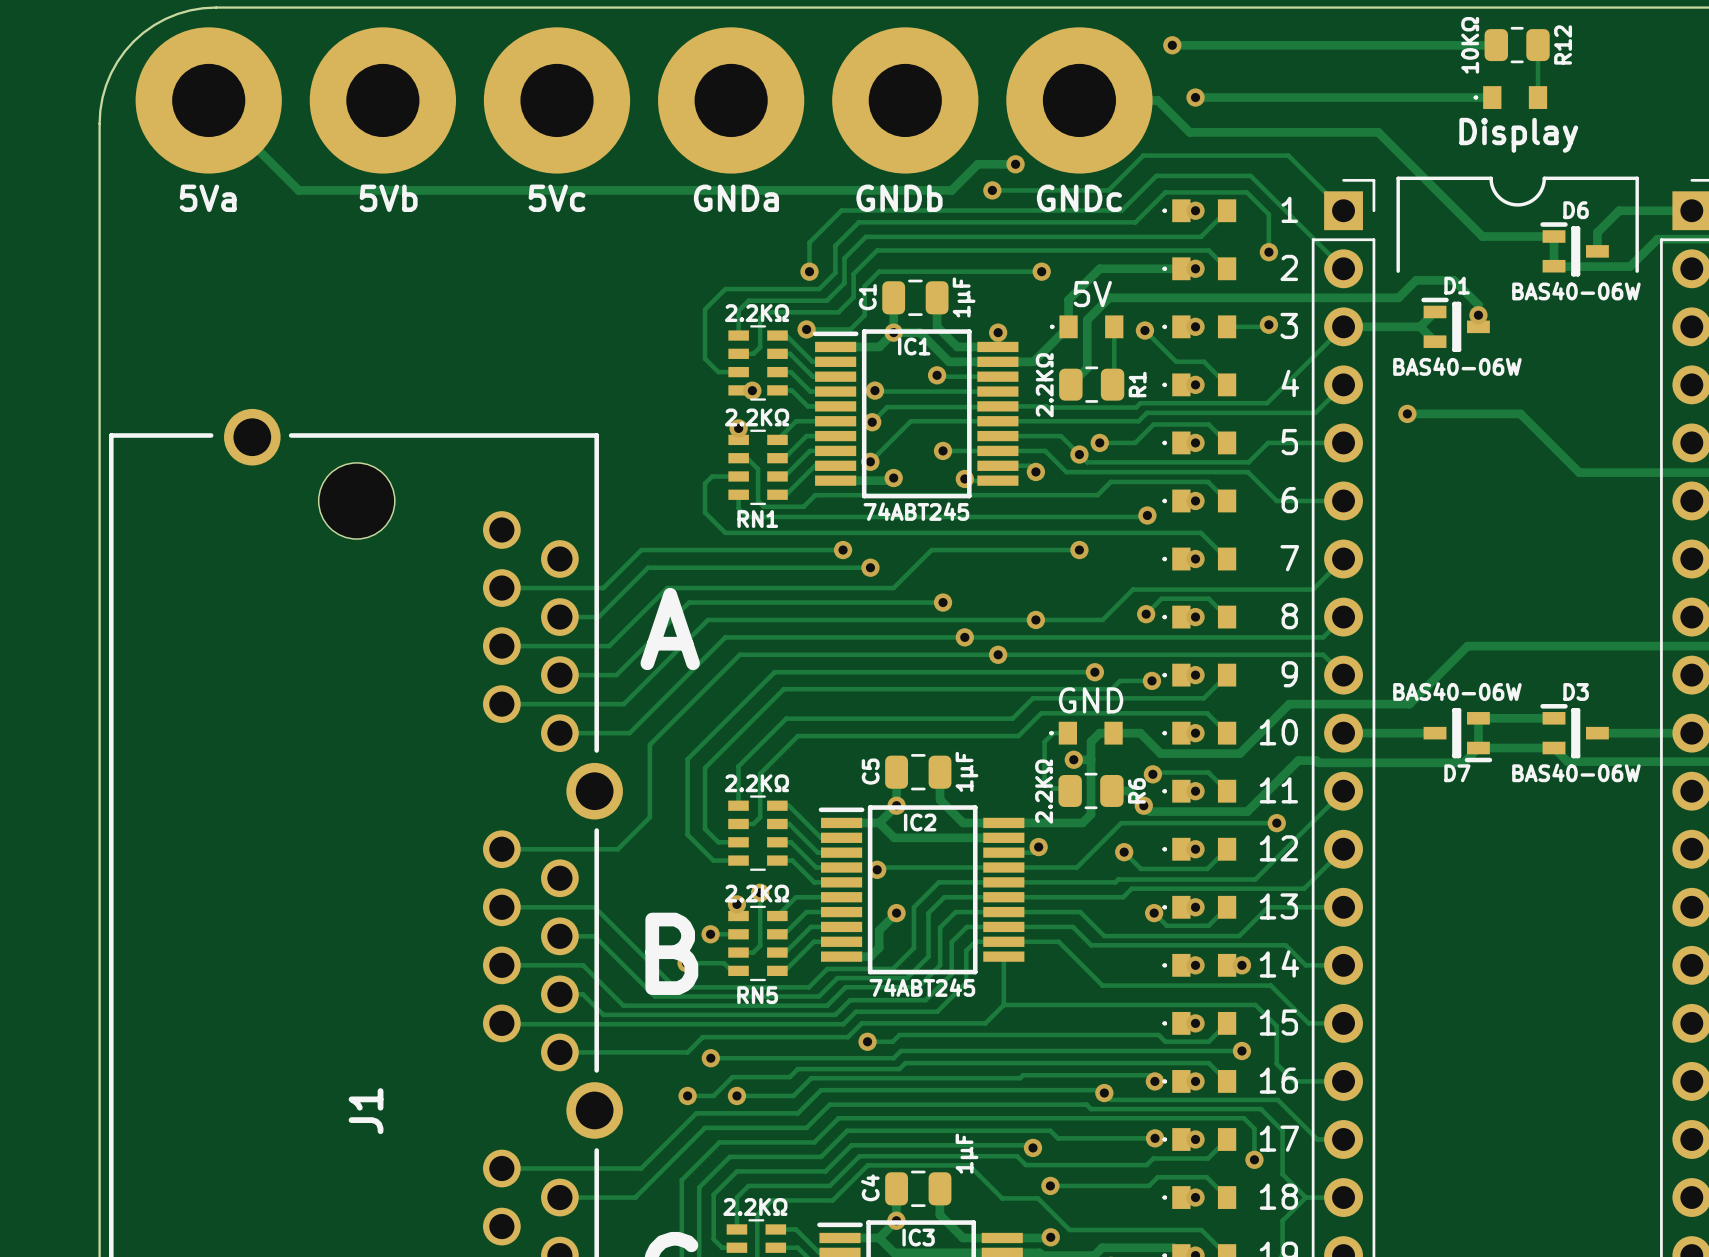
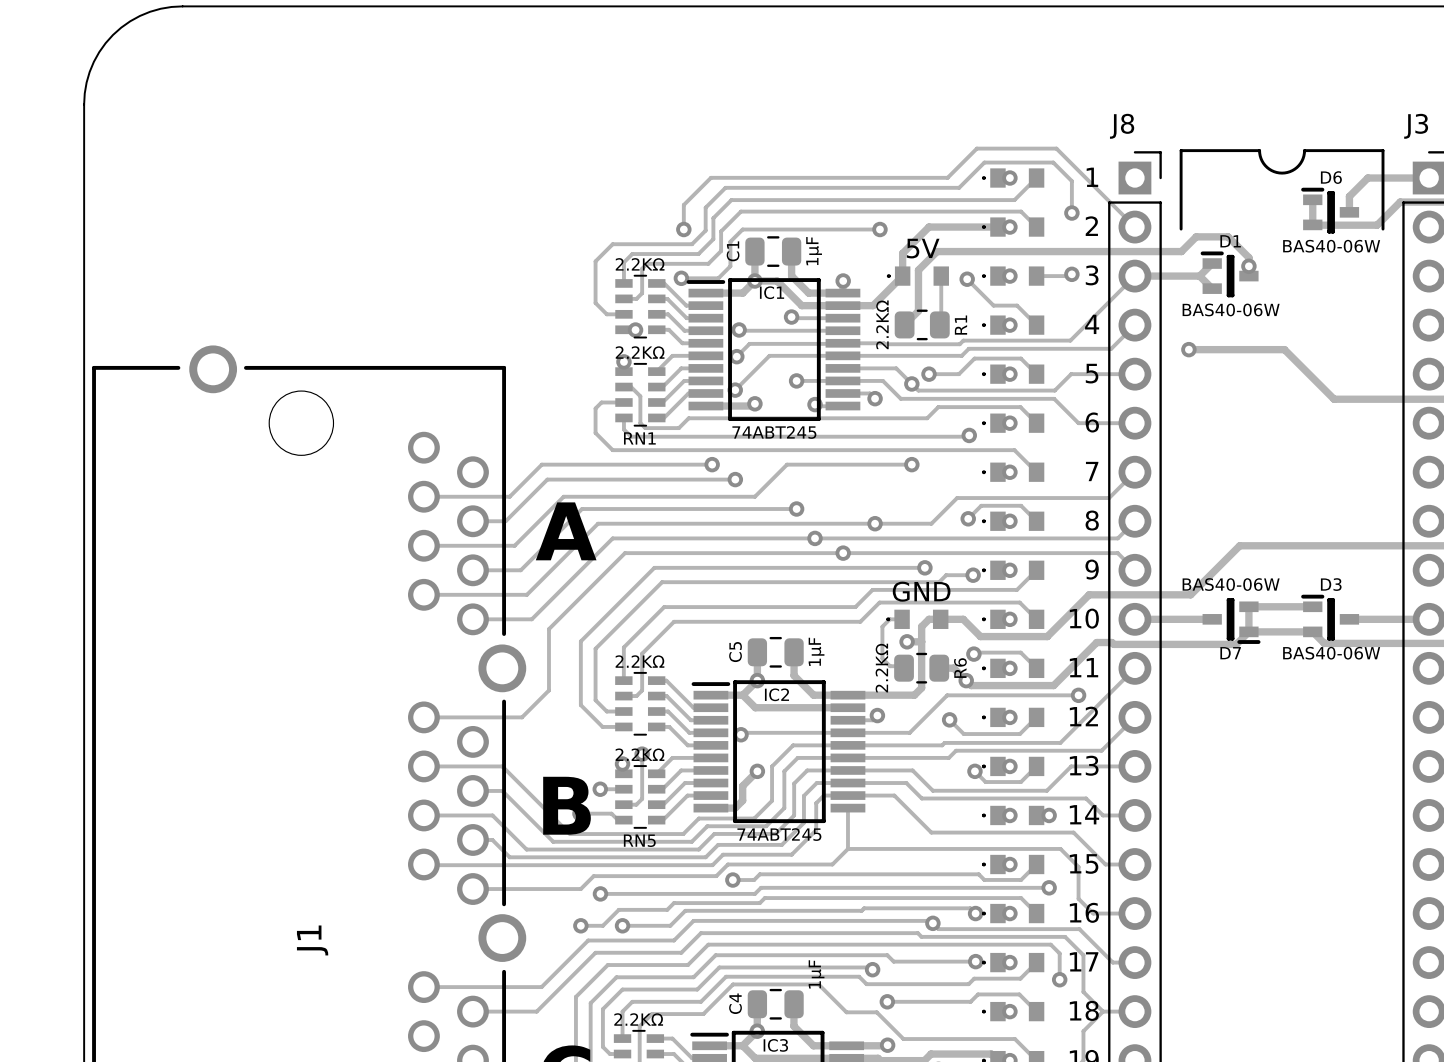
track: (1172, 45) (1496, 45) -> none
via: (1172, 45) -> none
R12: 10KΩ (1517, 45) -> none
track: (1538, 45) (1538, 97) -> none
track: (1195, 97) (1492, 97) -> none
via: (1195, 97) -> none
part: (1510, 97) -> none
track: (208, 100) (298, 190) (951, 190) (977, 164) (1015, 164) -> none
part: (208, 100) -> none
part: (382, 100) -> none
part: (557, 100) -> none
part: (731, 100) -> none
part: (905, 100) -> none
track: (1079, 100) (1157, 100) (1189, 132) (1378, 132) (1482, 236) (1554, 236) -> none
part: (1079, 100) -> none
text: Display (1518, 135) -> none
J8 name: none -> J8 (1122, 126)
J3 name: none -> J3 (1416, 126)
via: (1015, 164) -> none
track: (992, 190) (1108, 190) (1143, 155) (1288, 155) (1343, 210) -> none
via: (992, 190) -> none
text: 5Va (208, 198) -> none
text: 5Vb (388, 198) -> none
text: 5Vc (557, 198) -> none
text: GNDa (736, 198) -> none
text: GNDb (899, 198) -> none
text: GNDc (1079, 198) -> none

